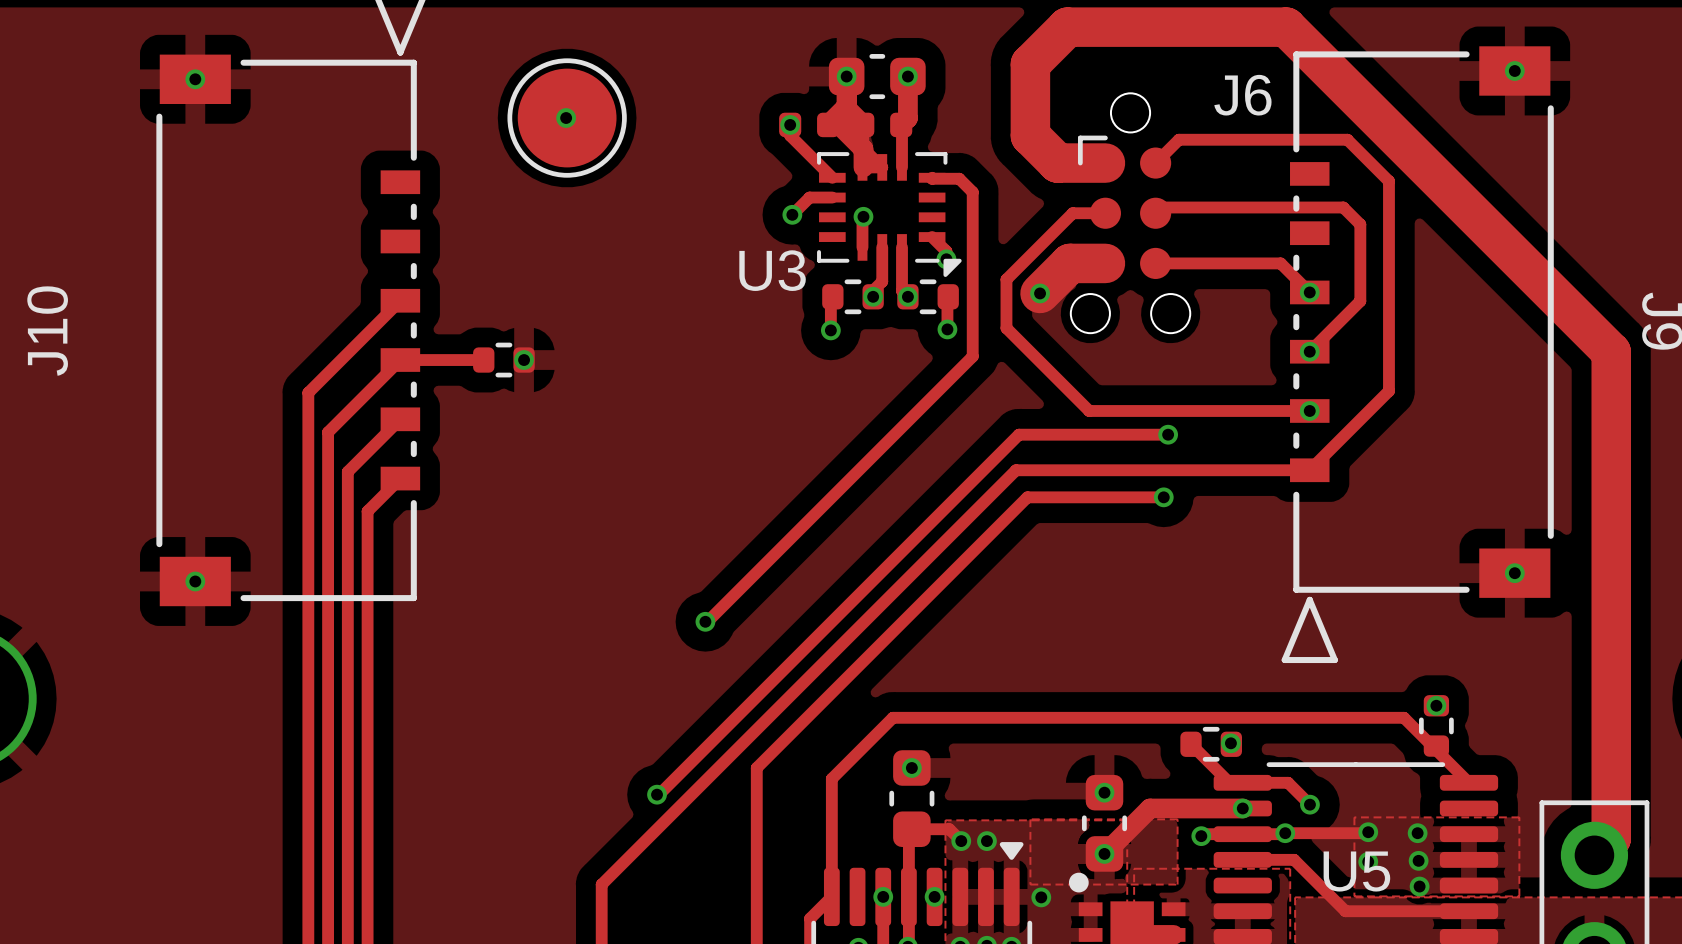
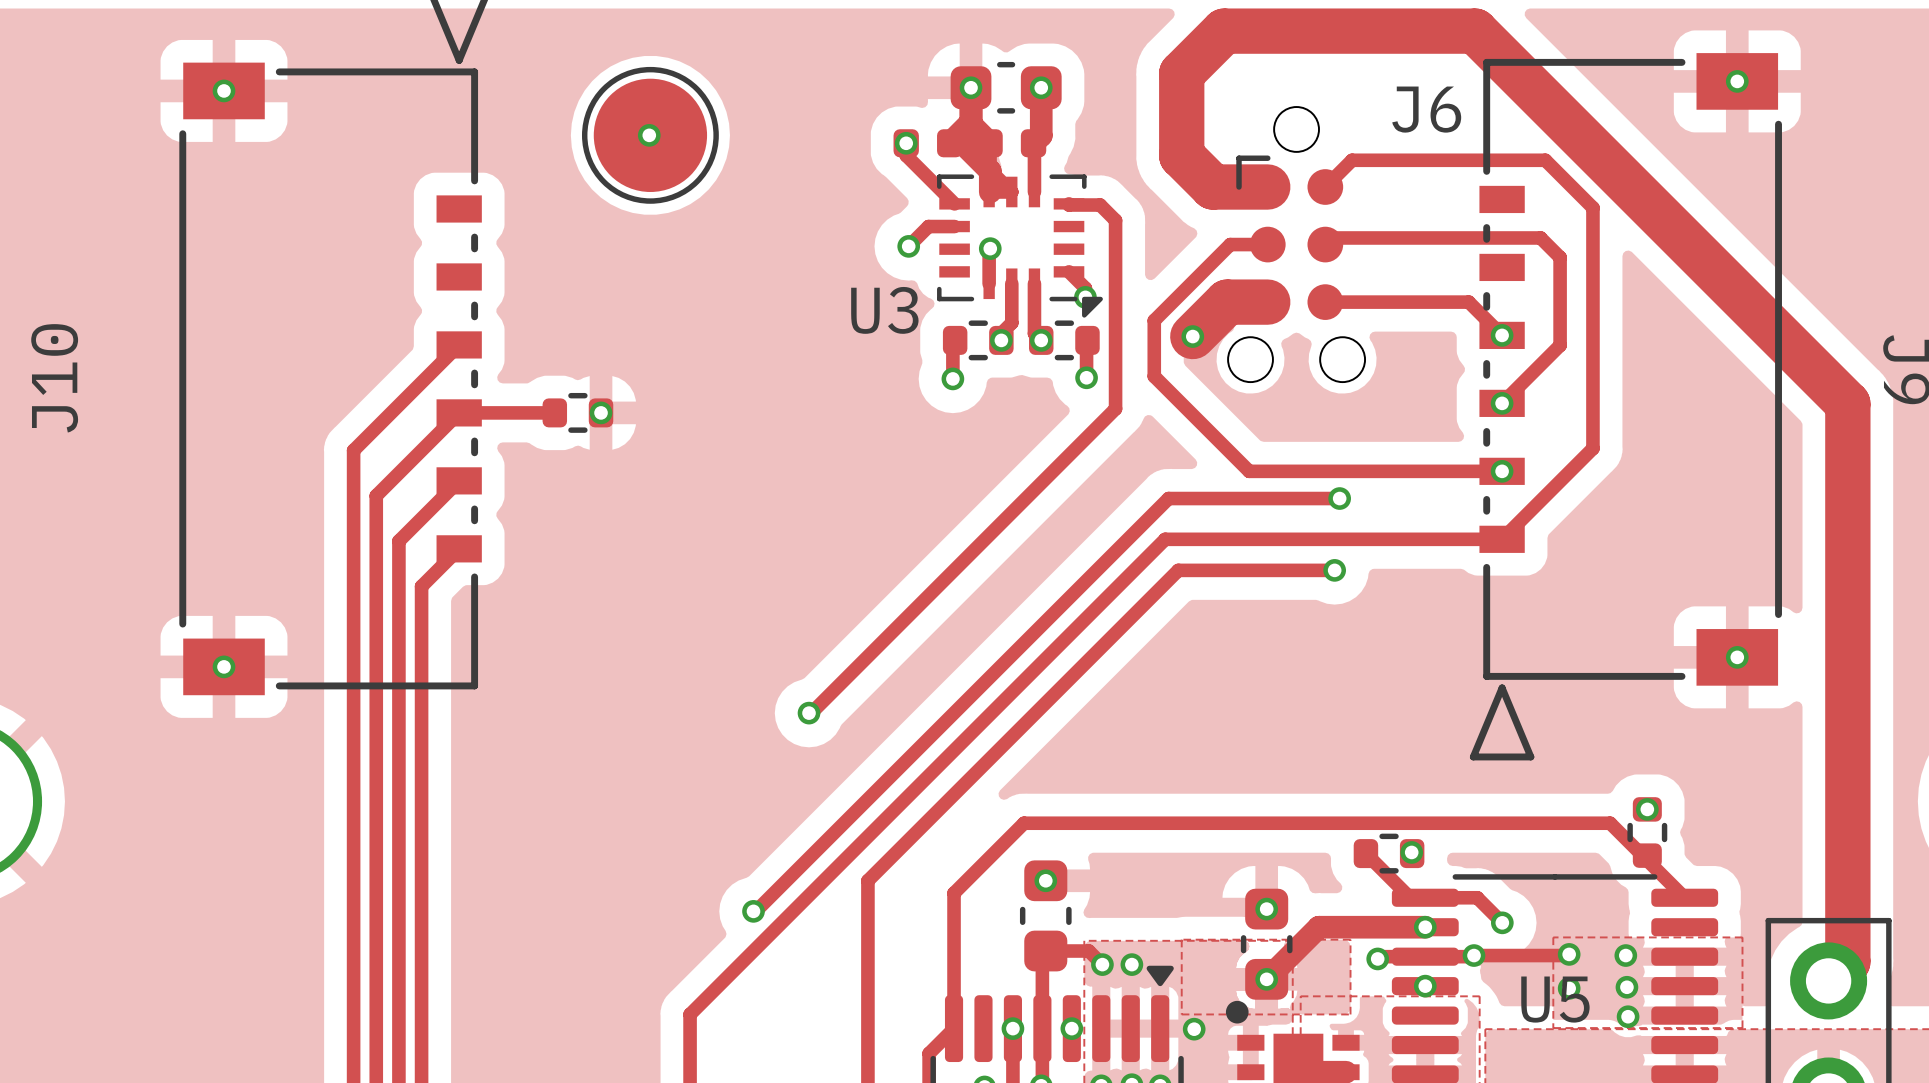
track: (1242, 859) (1294, 859) (1345, 911) (1468, 911) -> none
via: none -> (1425, 986)

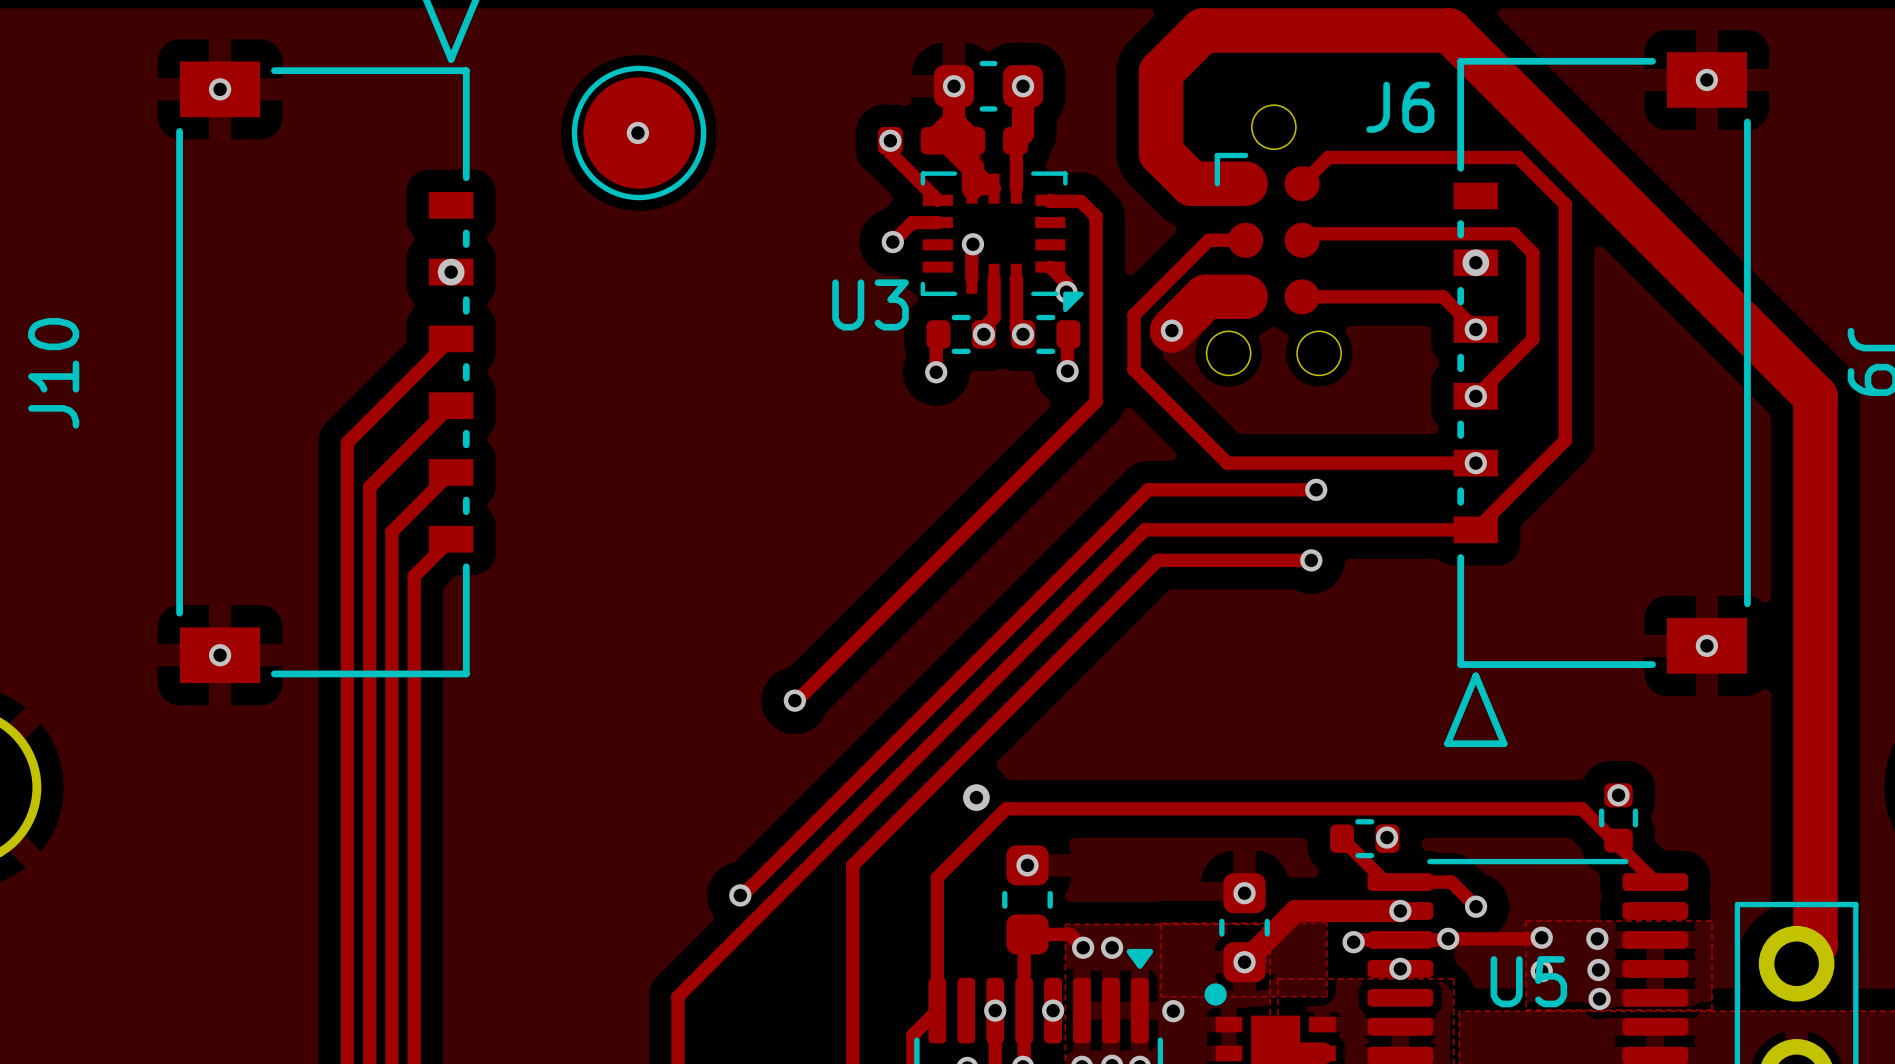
via: none -> (1475, 262)
via: none -> (451, 272)
track: (459, 412) (554, 412) -> none
part: (577, 412) -> none
via: (601, 412) -> none
via: none -> (976, 797)

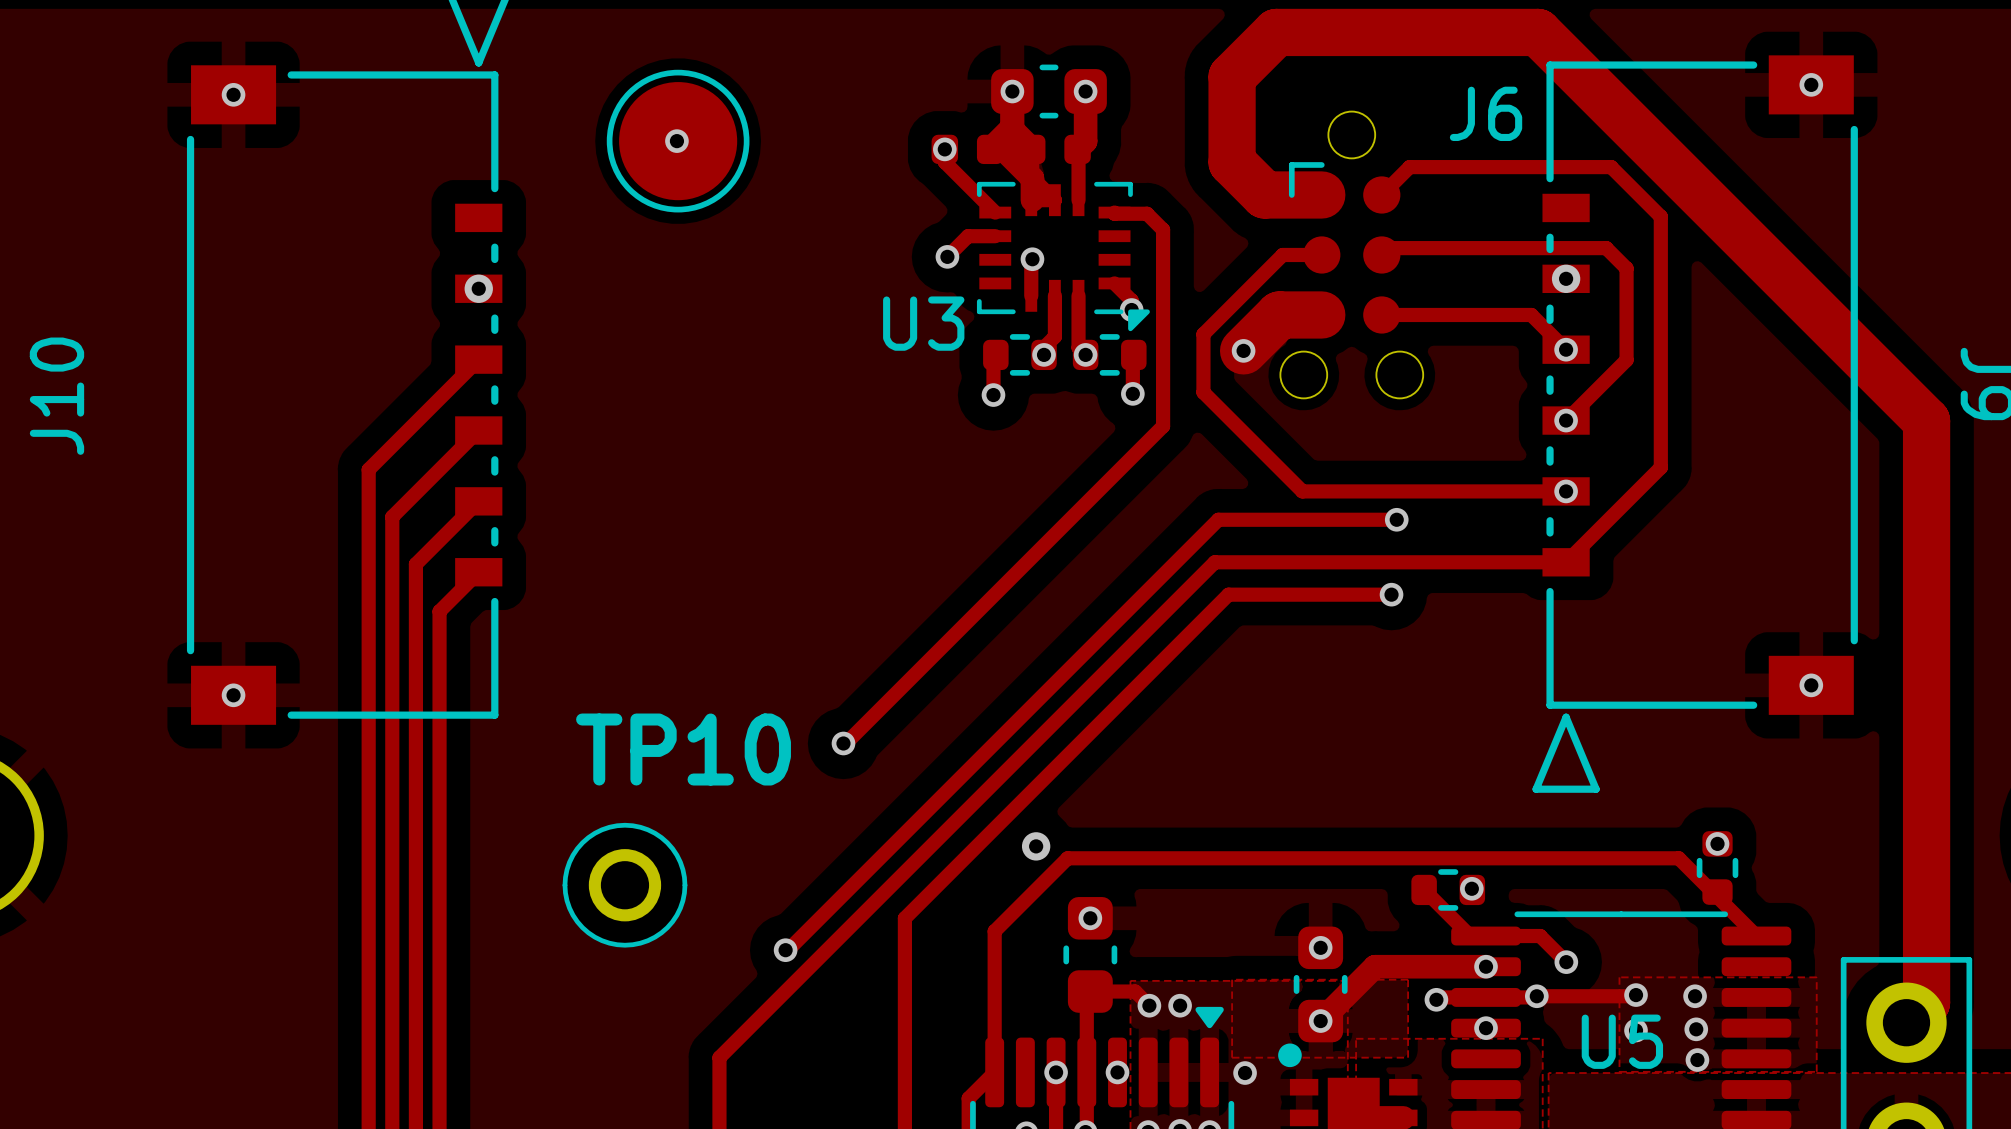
TP10: none -> (624, 885)

